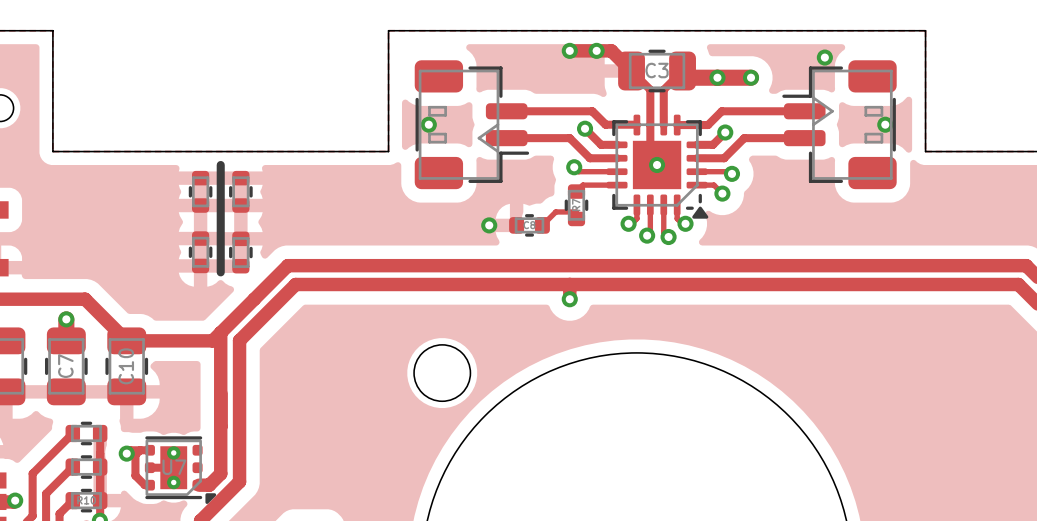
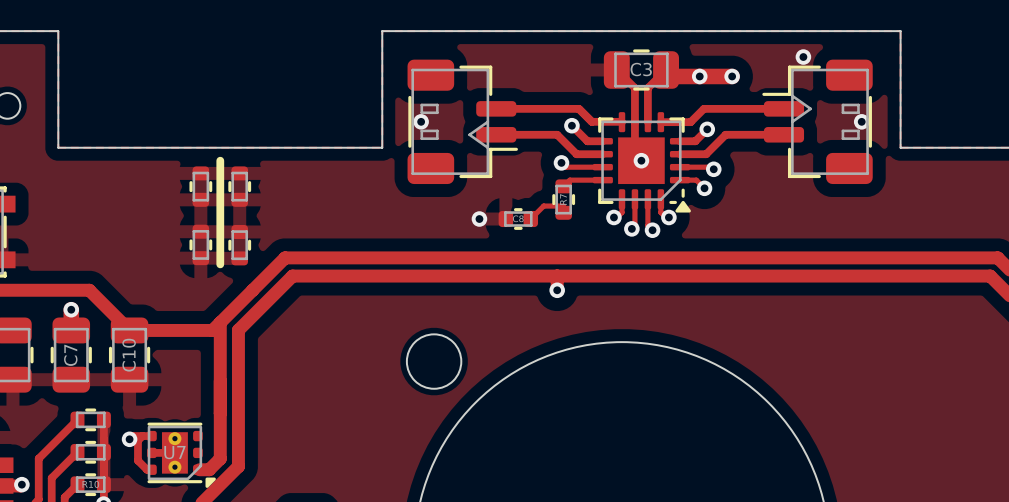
track: (569, 50) (611, 50) (631, 71) -> none
via: (569, 50) -> none
via: (596, 50) -> none

